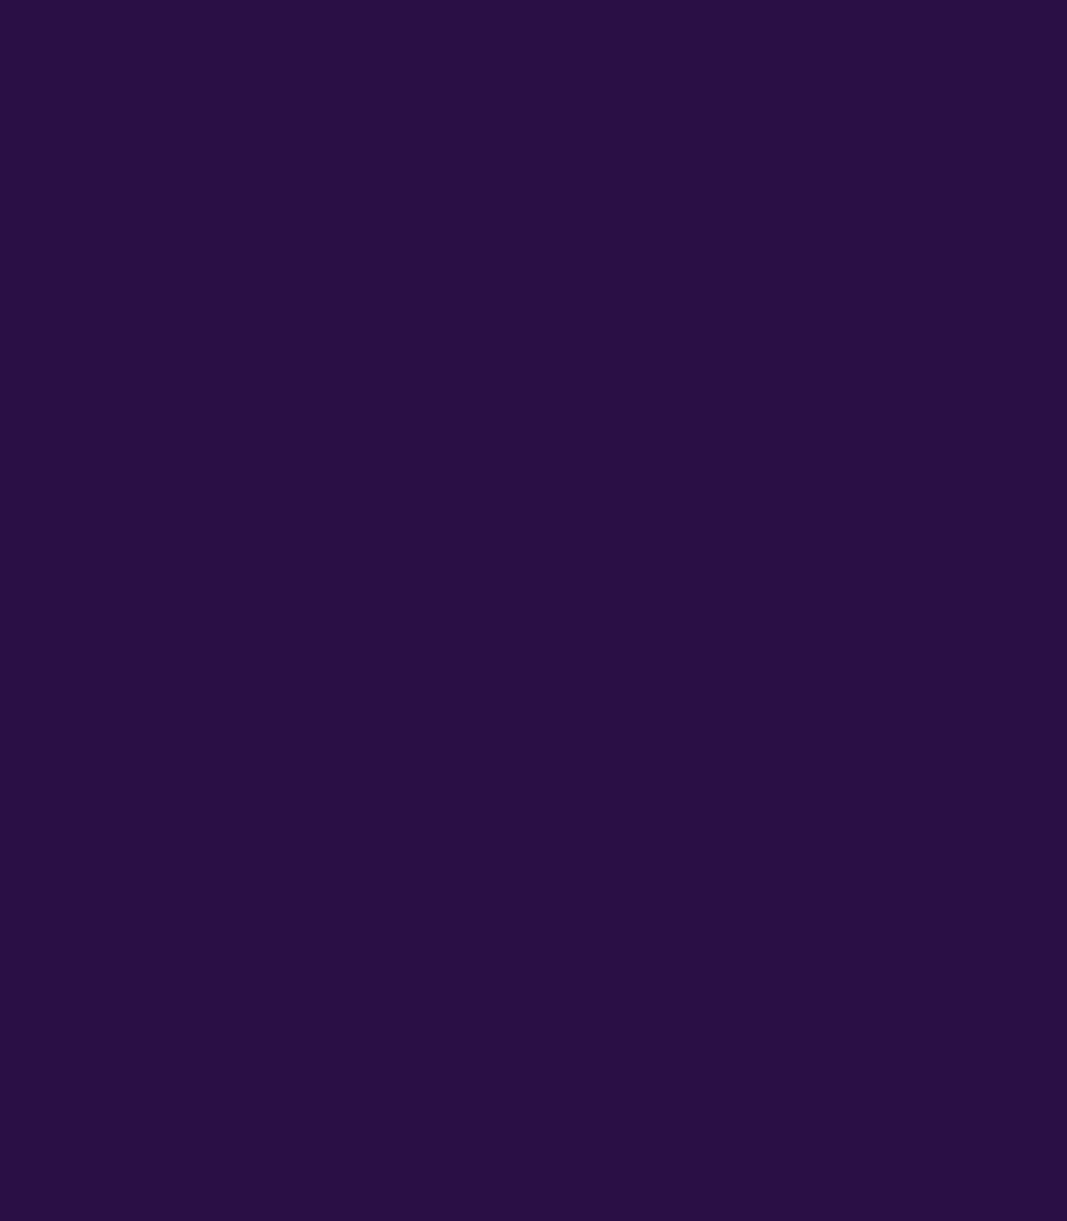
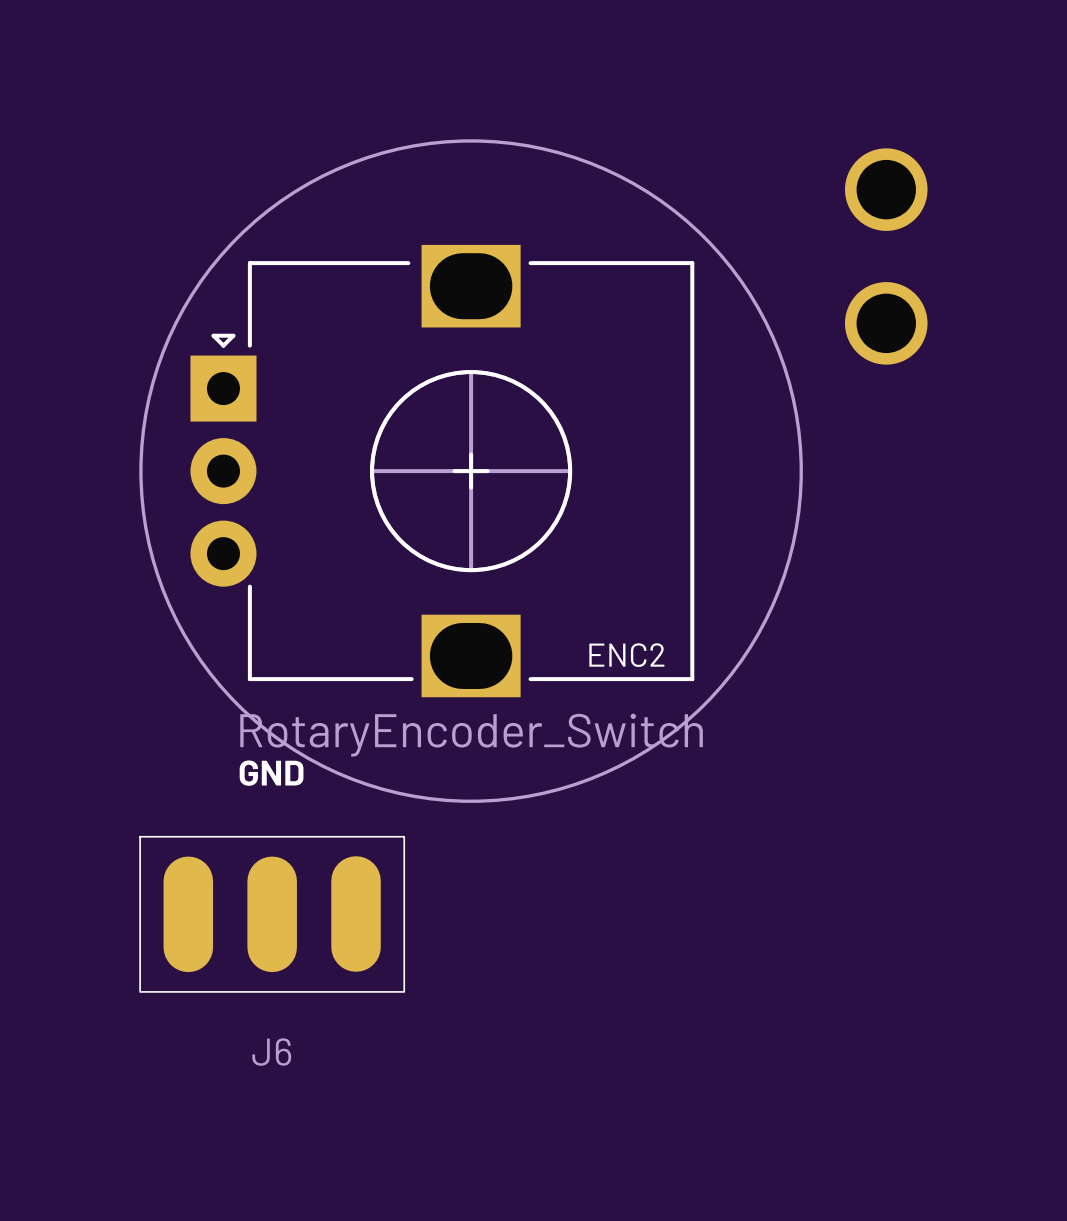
part: none -> (886, 189)
part: none -> (886, 323)
ENC2: none -> RotaryEncoder_Switch (471, 471)
J6: none -> (272, 914)

